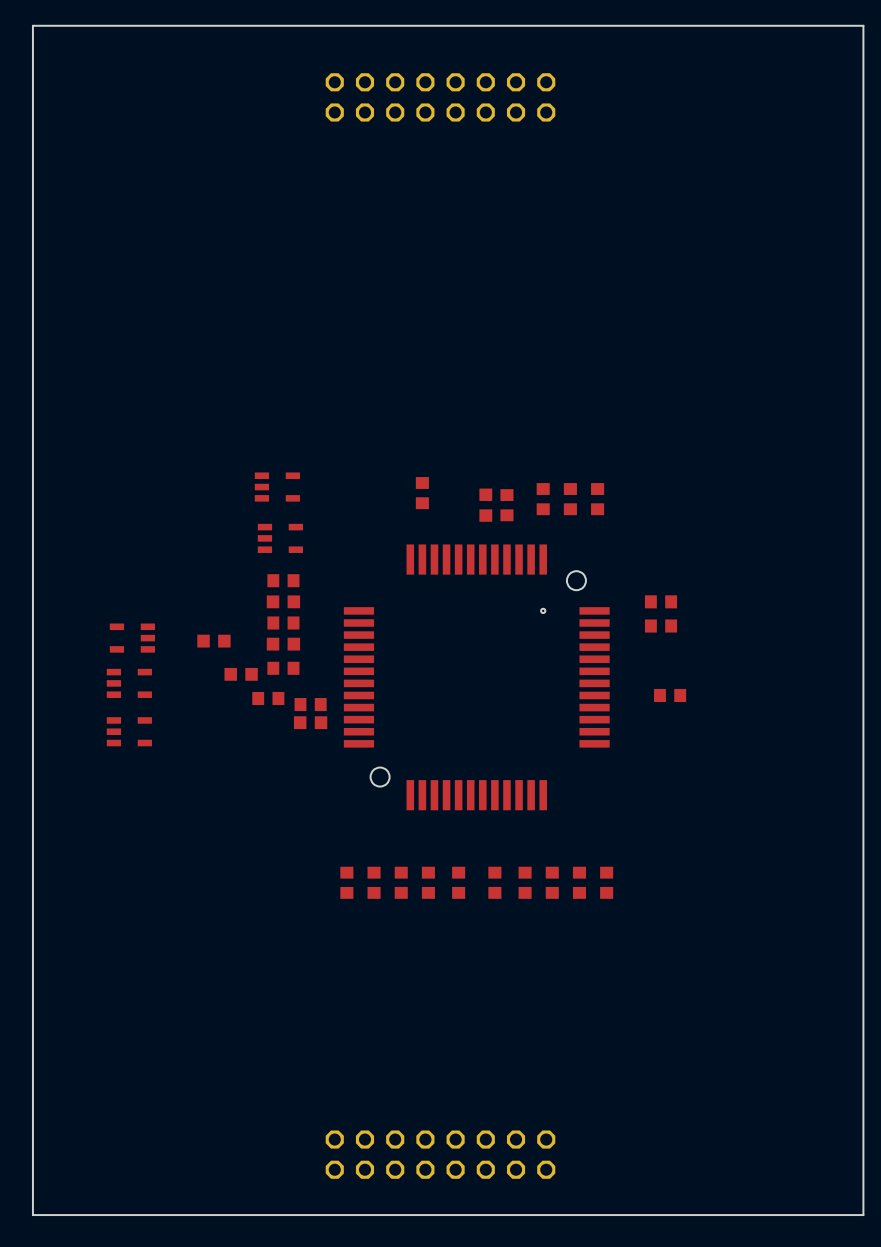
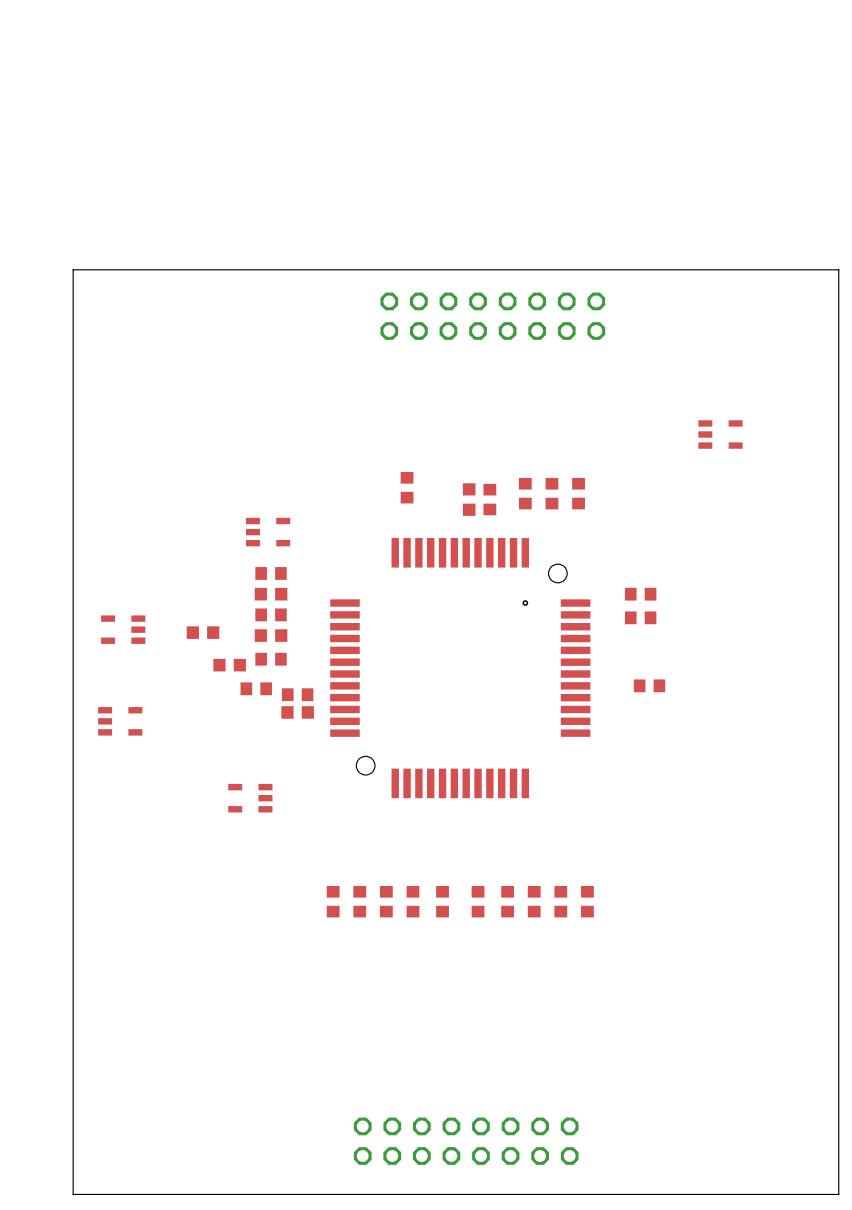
part position: (440, 97) -> (492, 316)
board edge: (863, 270) (863, 25) (32, 25) (32, 1215) (81, 1215) -> (838, 269) (73, 269) (73, 1194)
part: none -> (720, 434)
part: (277, 487) -> none
part: (129, 683) -> none
part: none -> (250, 798)
part: (346, 882) -> none
part: (374, 882) -> none
part: (401, 882) -> none
part: (428, 882) -> none
part: (458, 882) -> none
part: (494, 882) -> none
part: (525, 882) -> none
part: (552, 882) -> none
part: (579, 882) -> none
part: (606, 882) -> none
part: none -> (333, 901)
part: none -> (359, 901)
part: none -> (386, 901)
part: none -> (412, 901)
part: none -> (442, 901)
part: none -> (478, 901)
part: none -> (507, 901)
part: none -> (534, 901)
part: none -> (560, 901)
part: none -> (587, 901)
part position: (440, 1154) -> (466, 1141)

